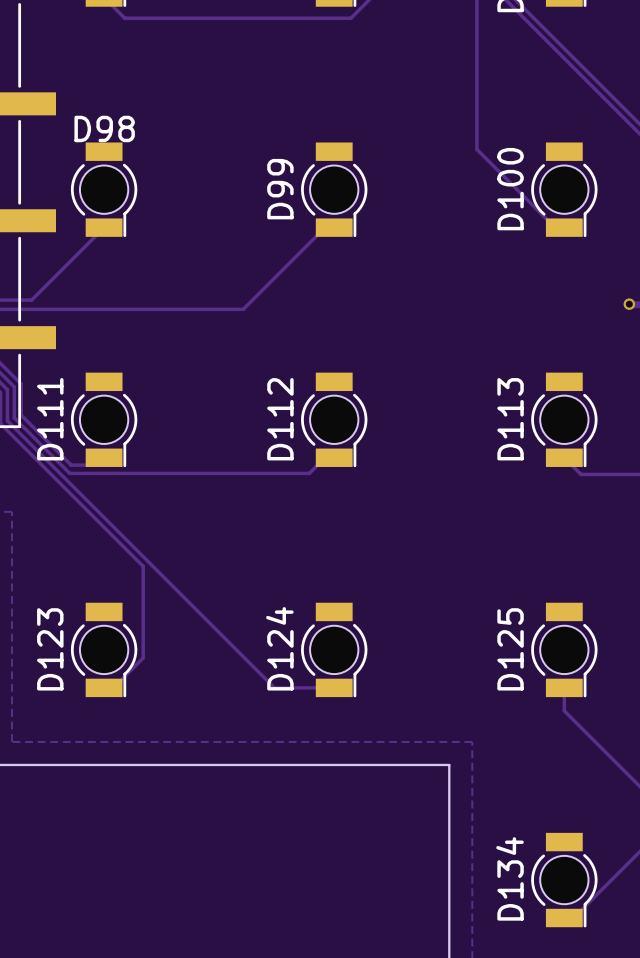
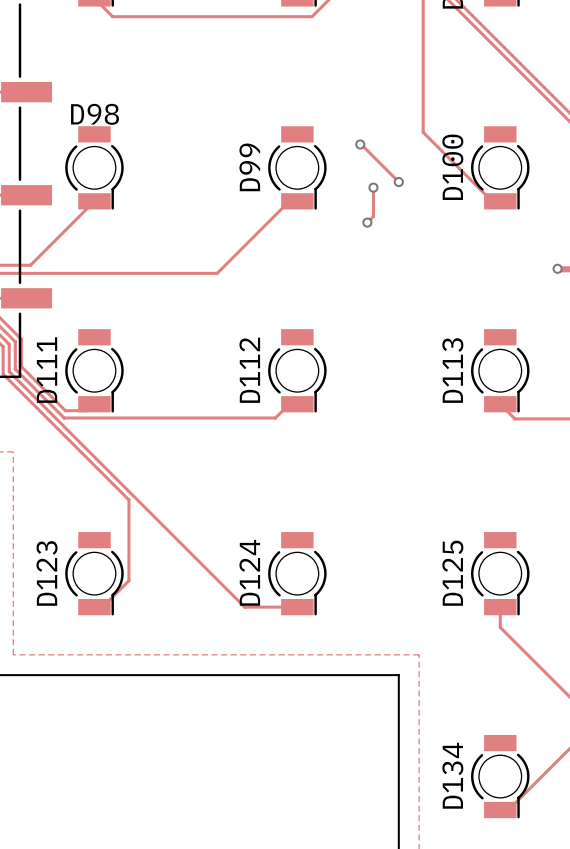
track: none -> (360, 144) (398, 182)
via: none -> (360, 144)
via: none -> (398, 182)
track: none -> (373, 187) (373, 216) (367, 222)
via: none -> (373, 187)
via: none -> (367, 222)

